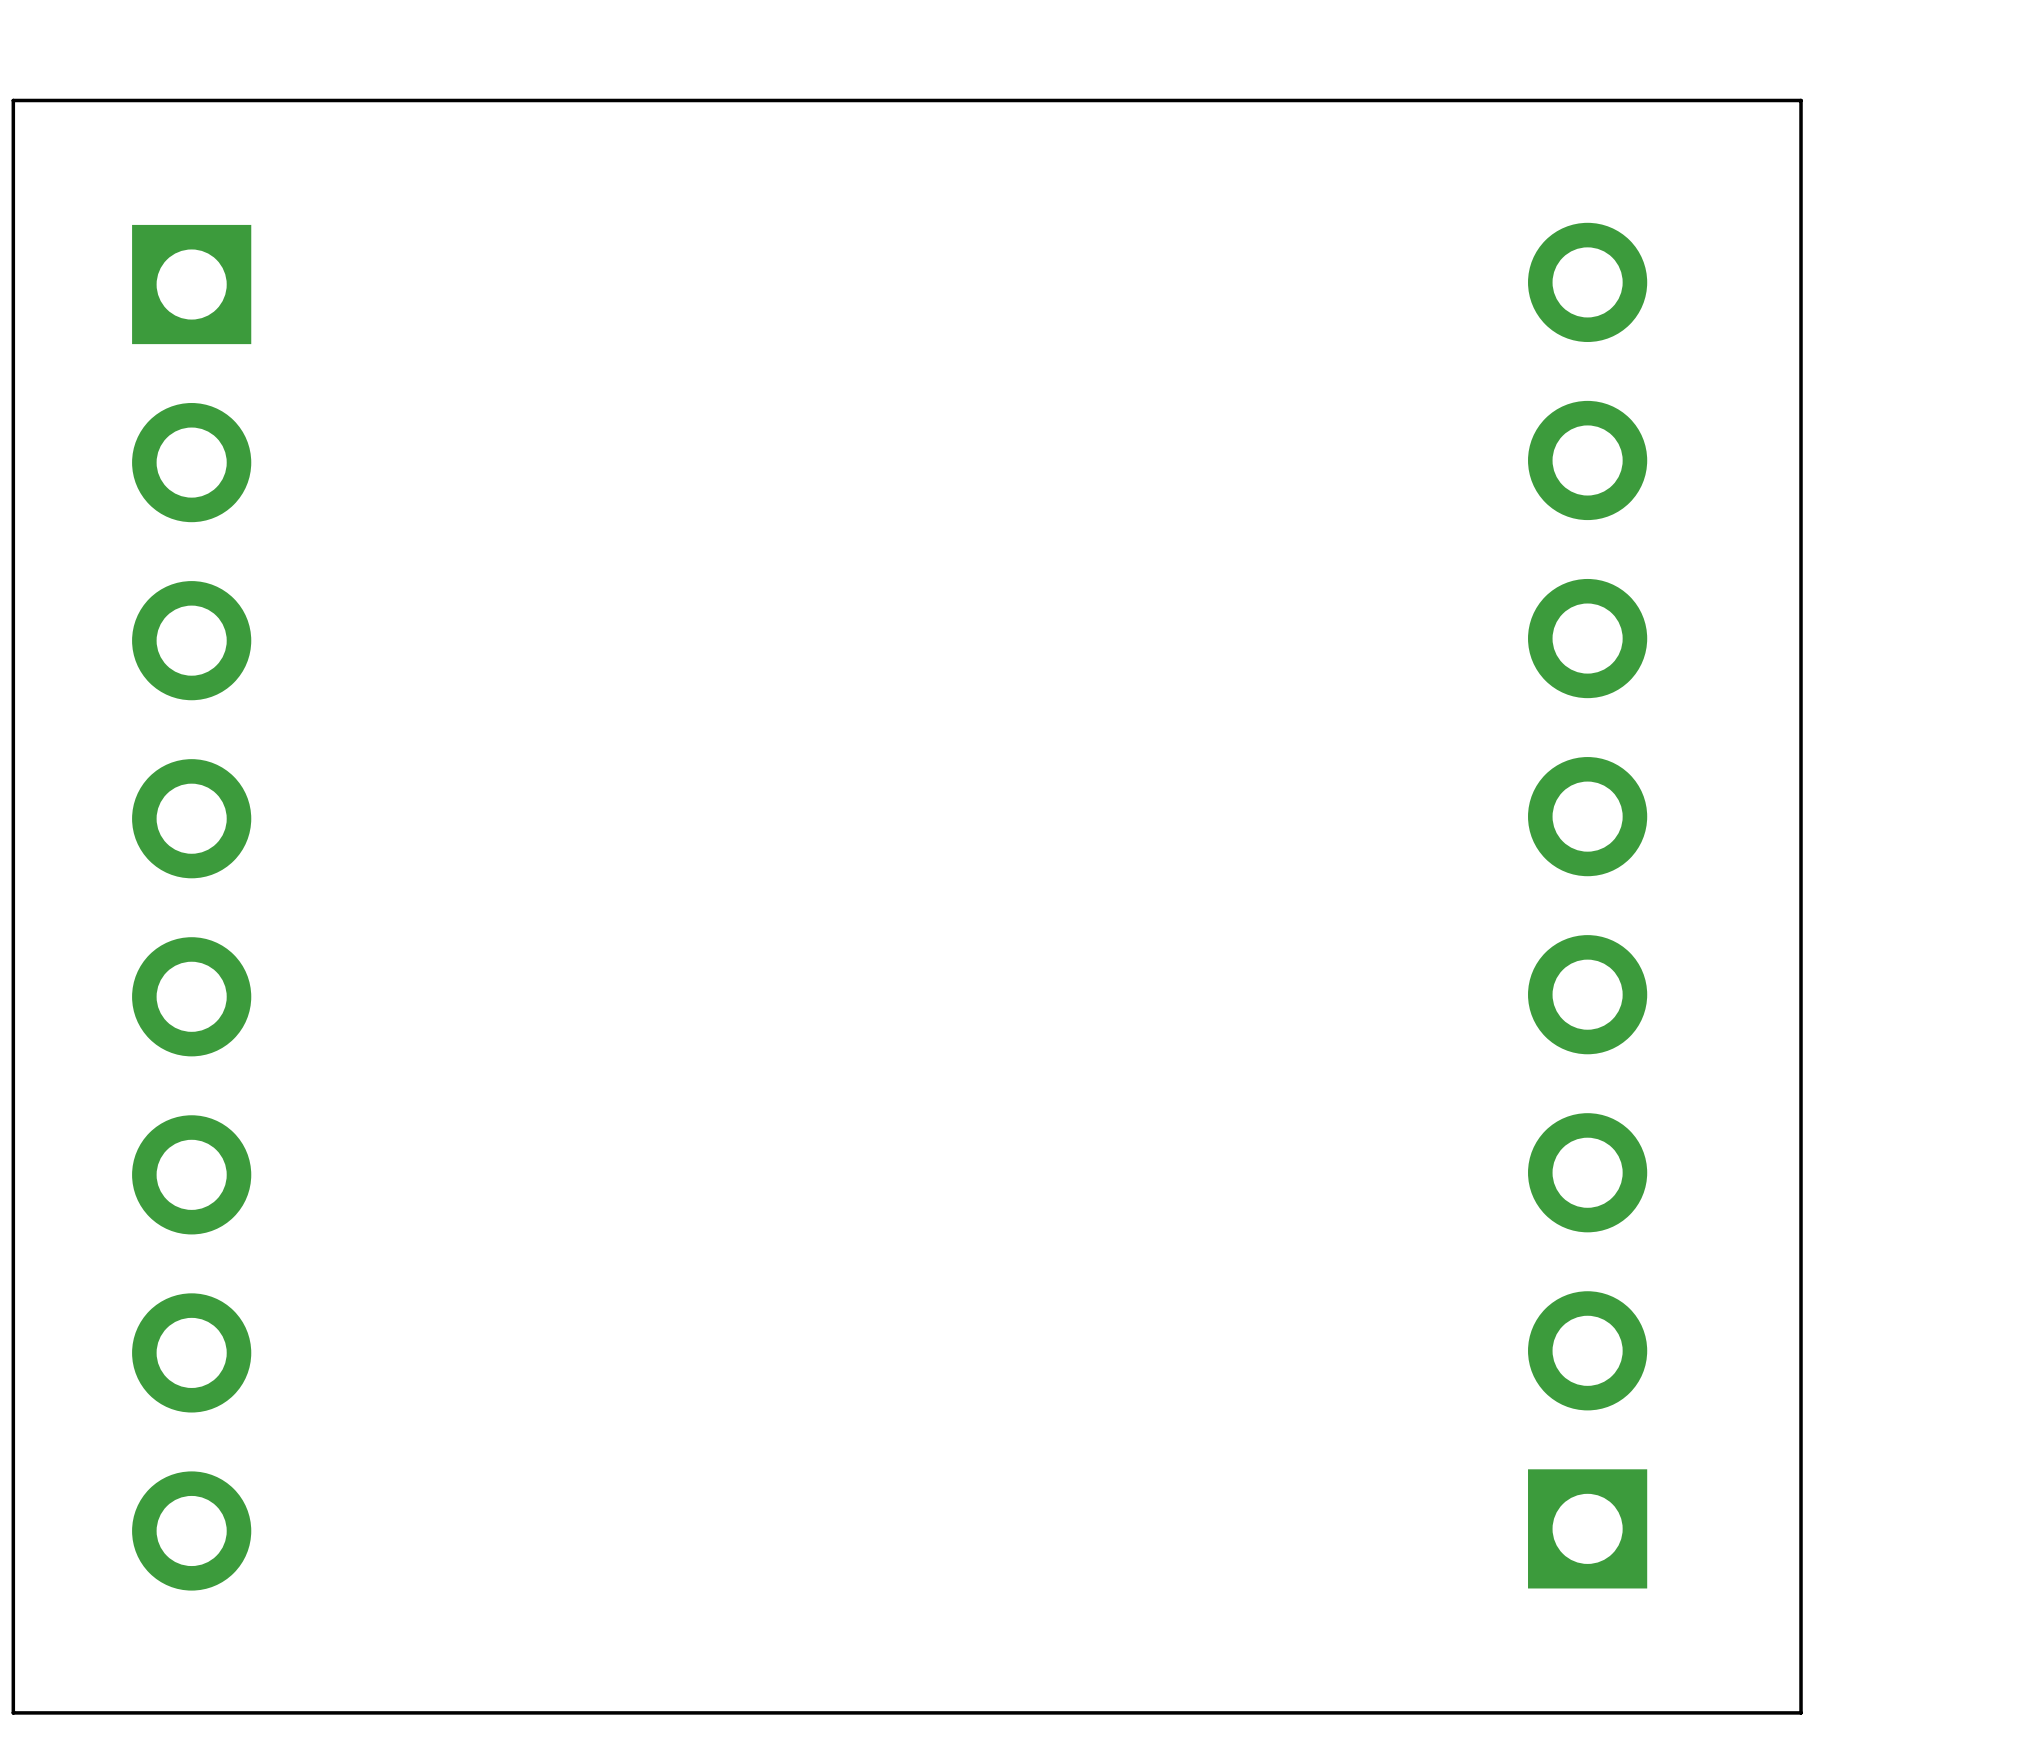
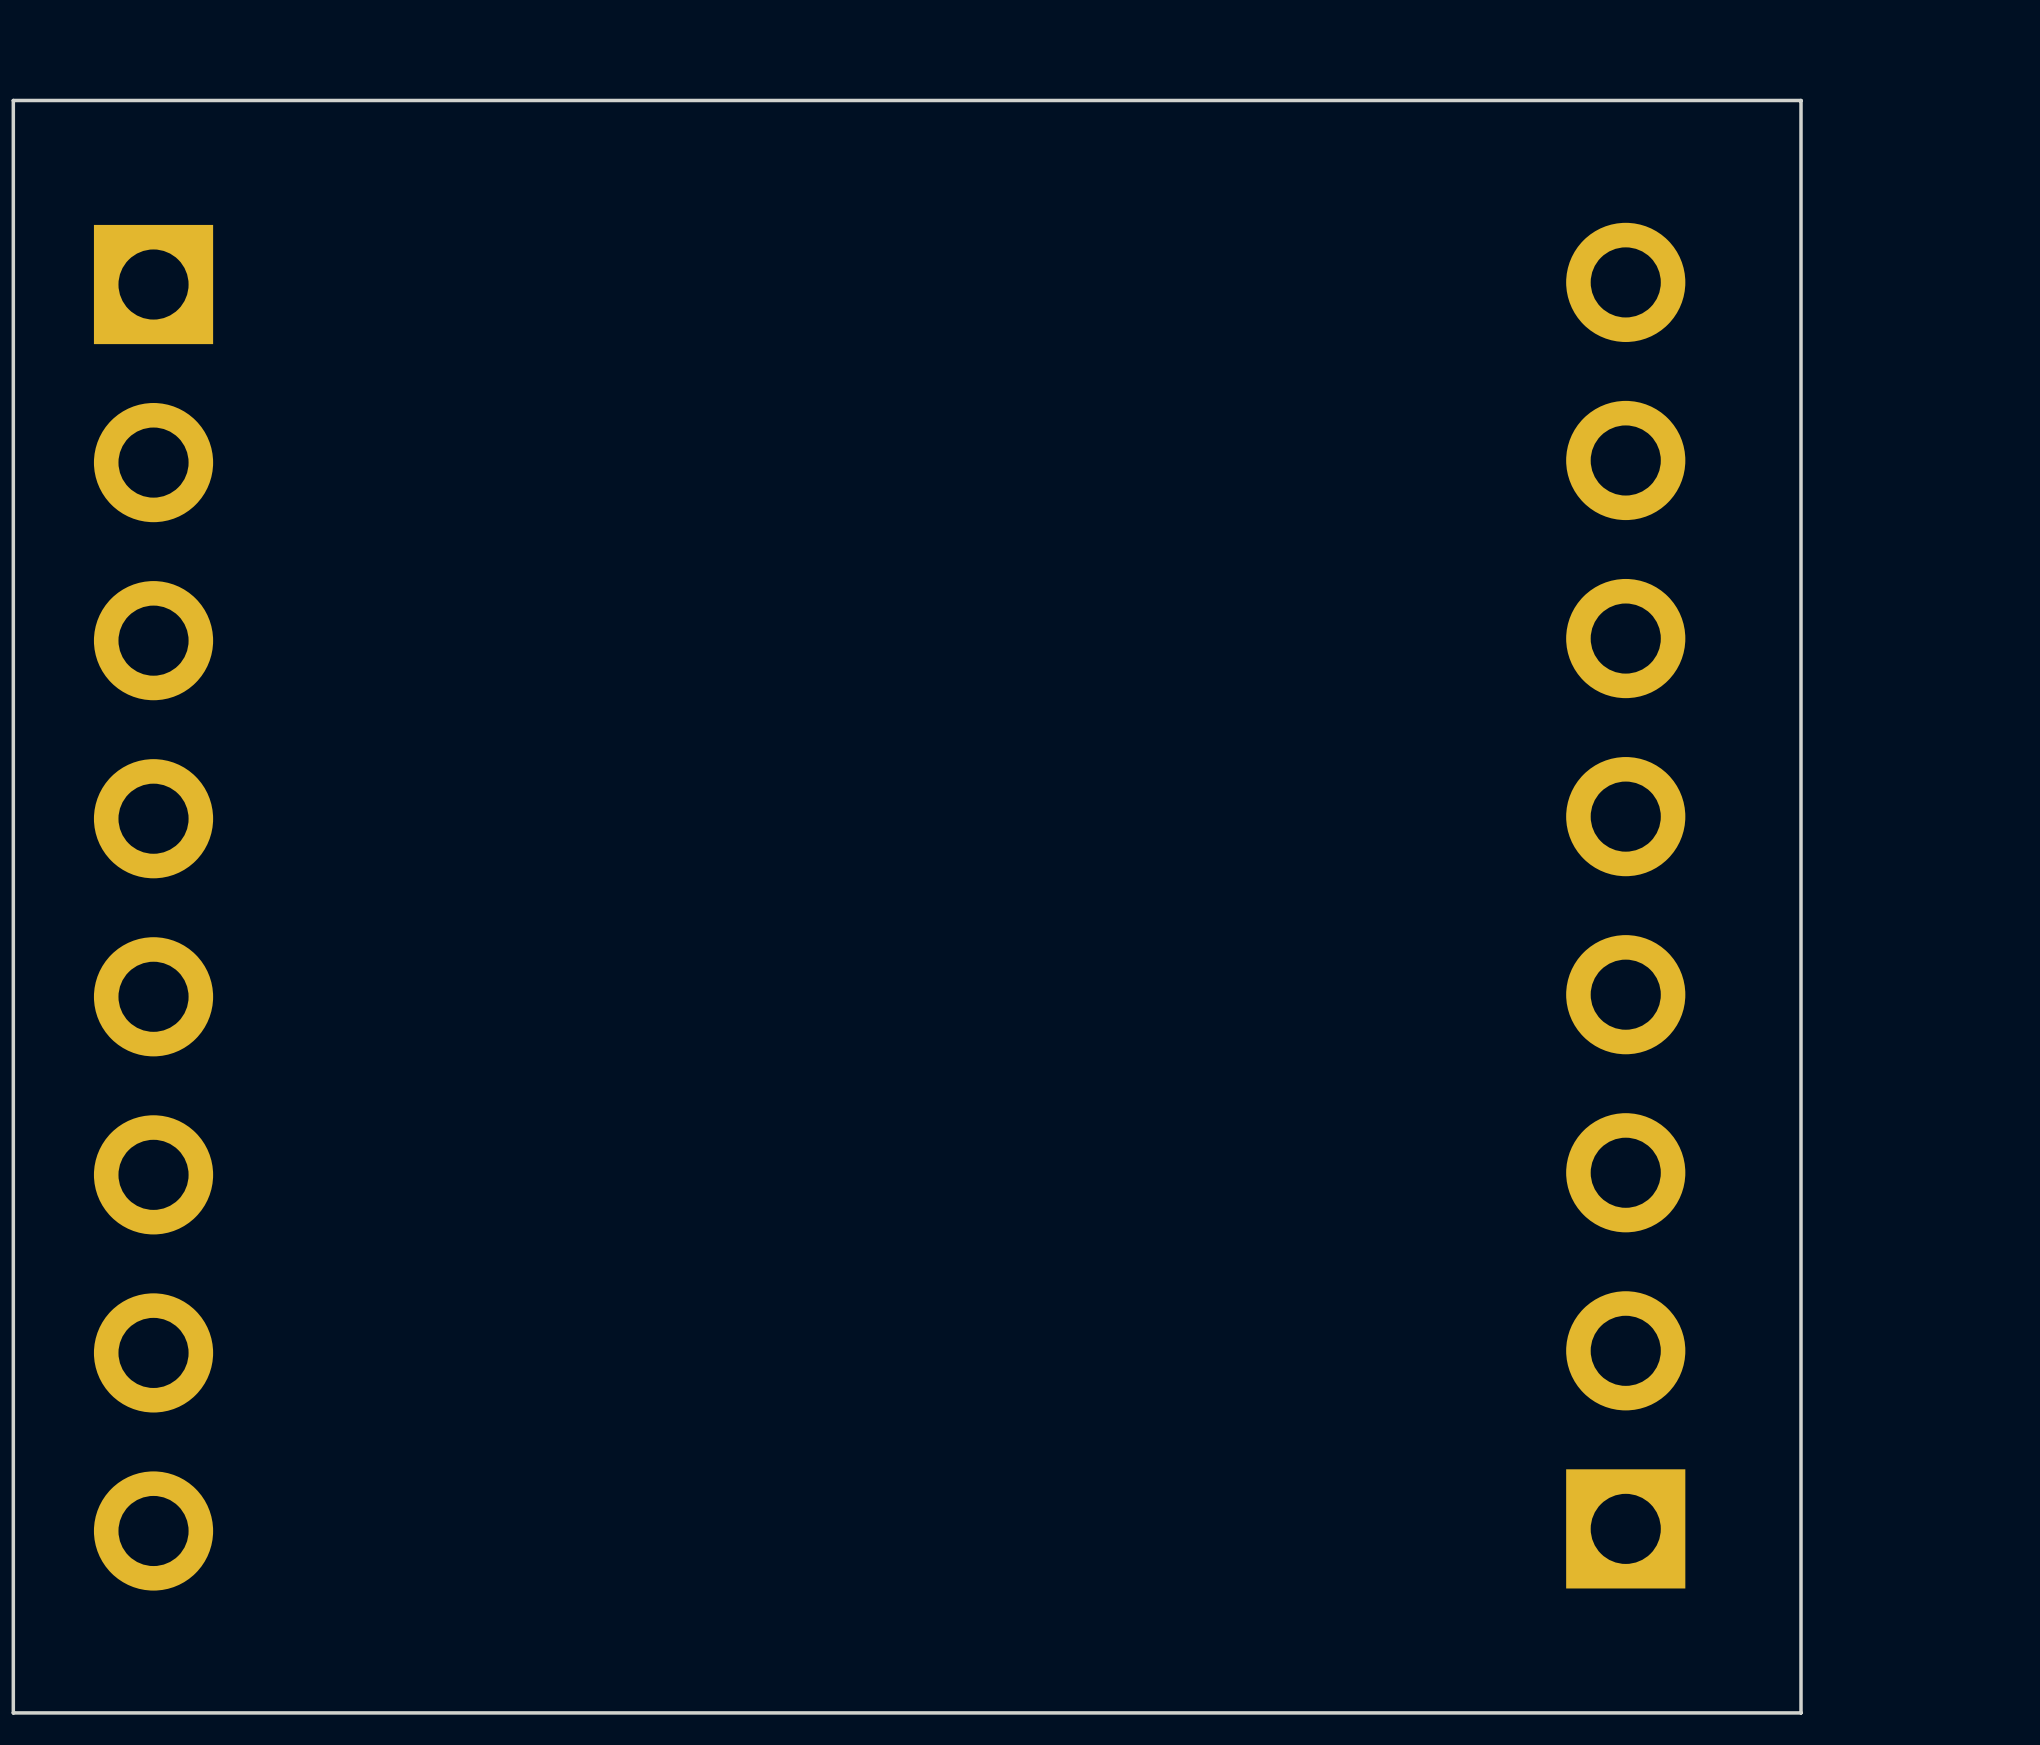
part position: (1587, 905) -> (1625, 905)
part position: (191, 907) -> (153, 907)

